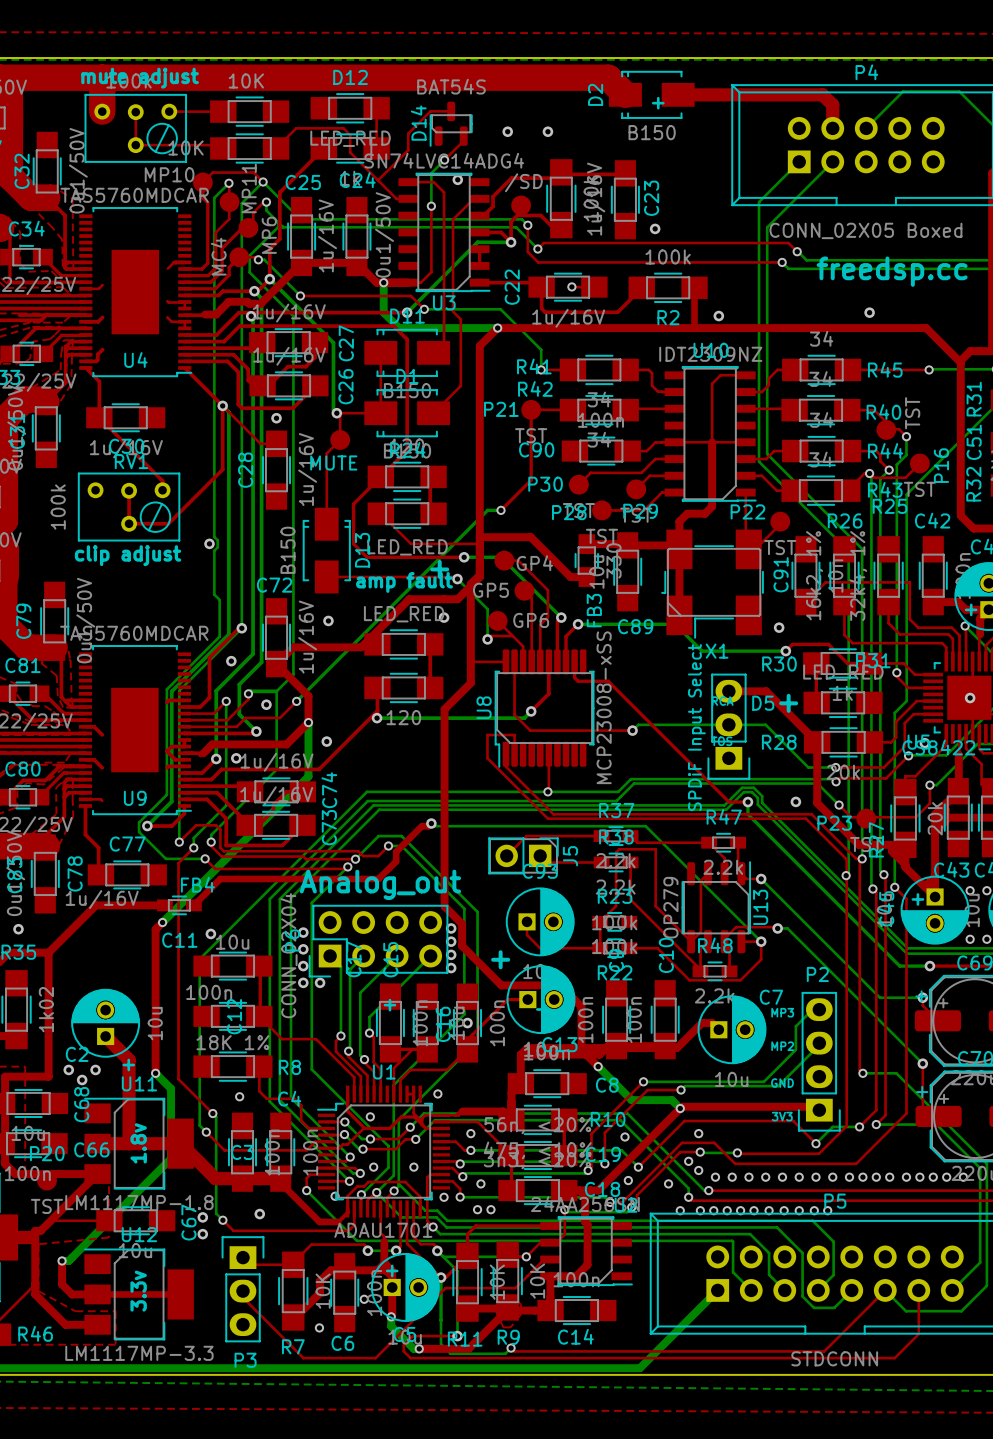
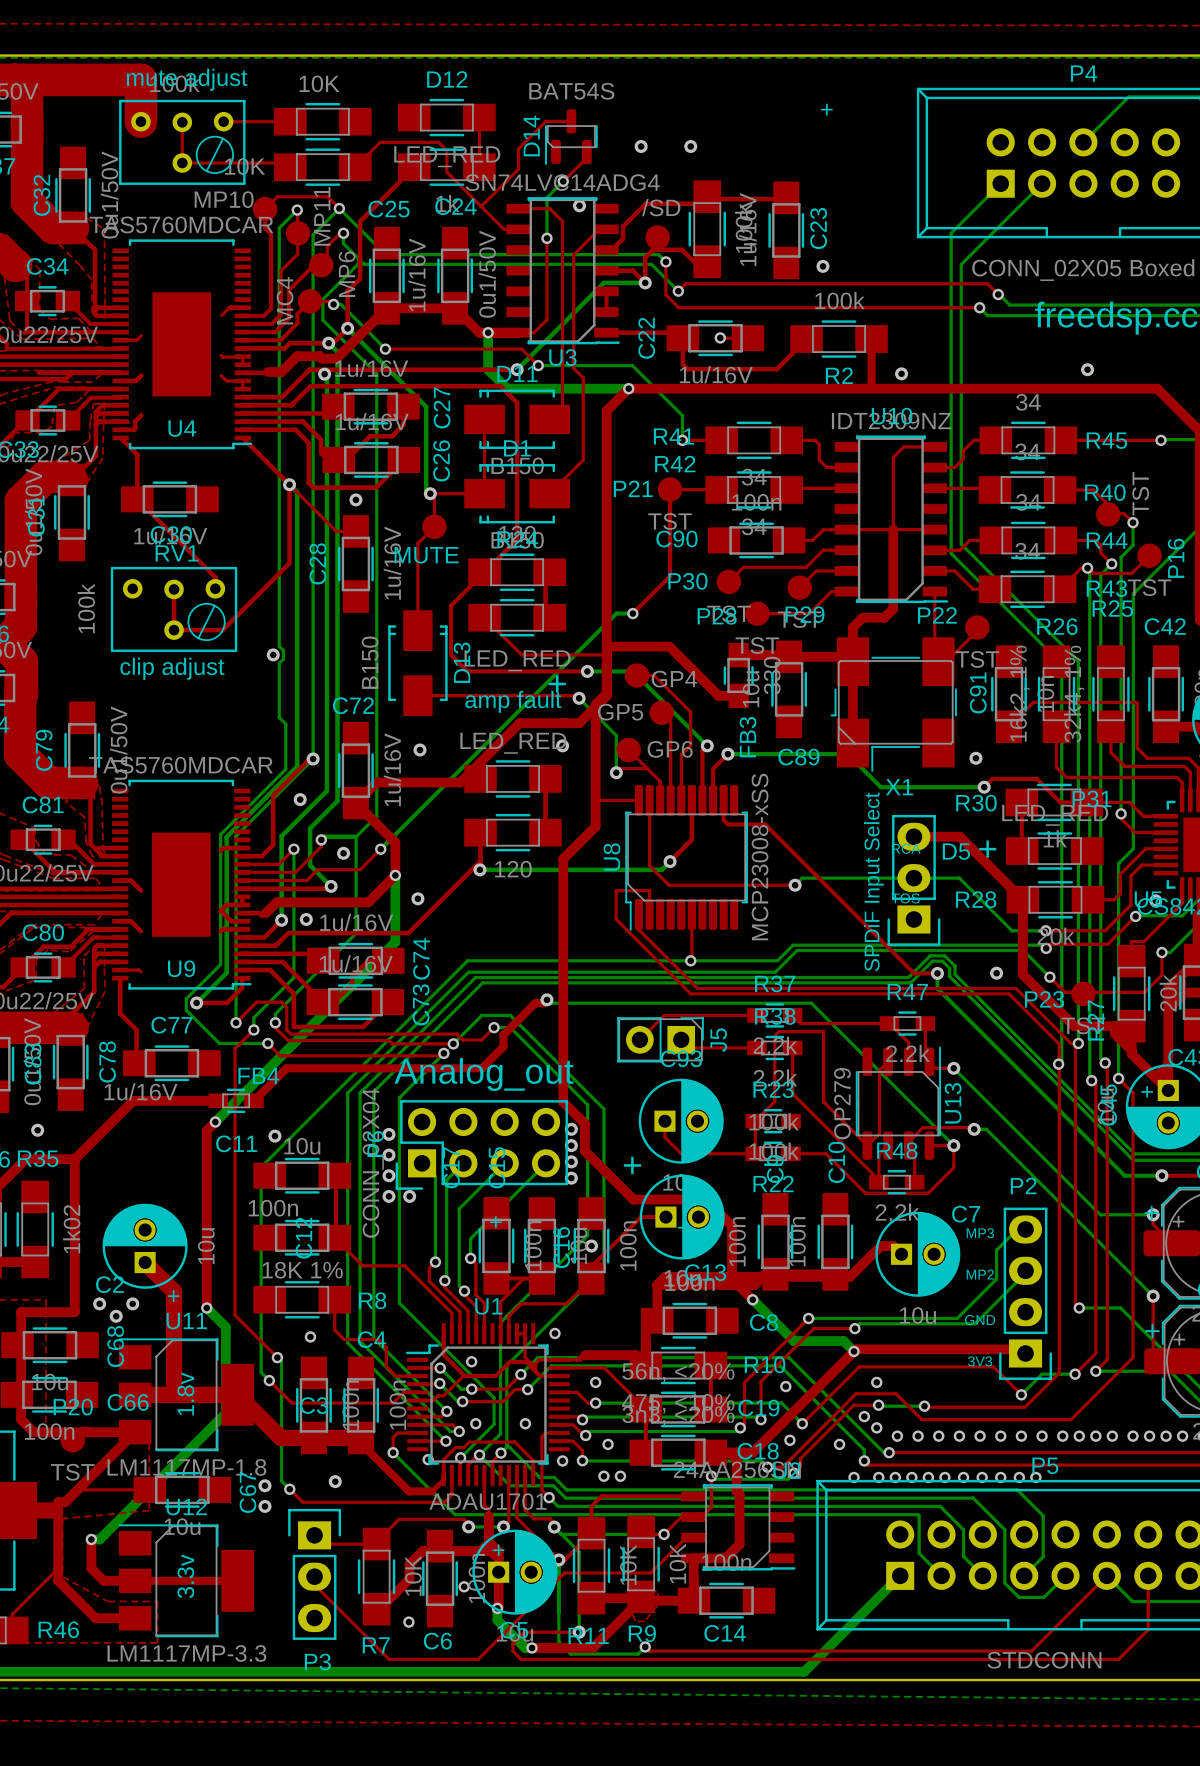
top track: (102, 77) (608, 77) (625, 94) -> none
D2: B150 (651, 94) -> none
top track: (678, 94) (822, 94) (832, 104) (832, 128) -> none

